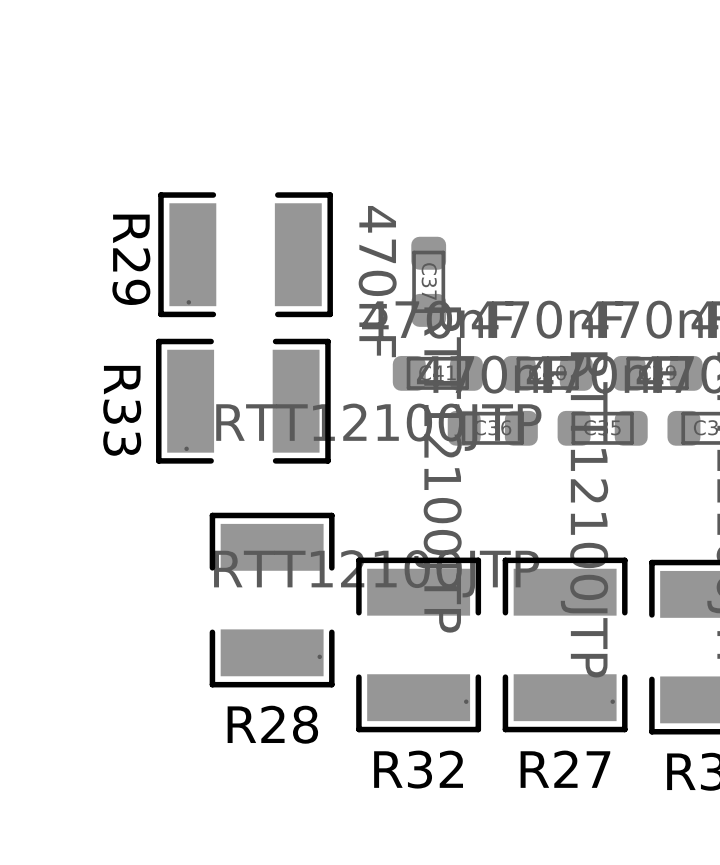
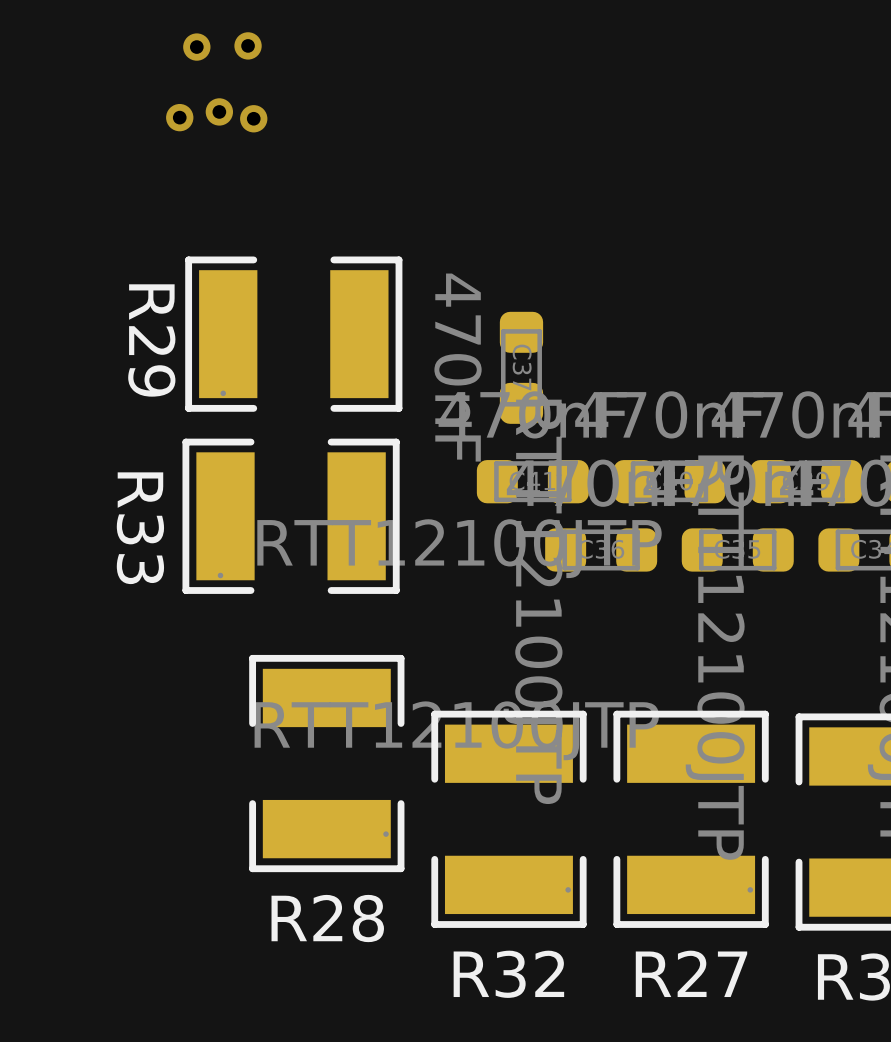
via: none -> (248, 45)
via: none -> (196, 47)
via: none -> (219, 111)
via: none -> (179, 117)
via: none -> (253, 118)

